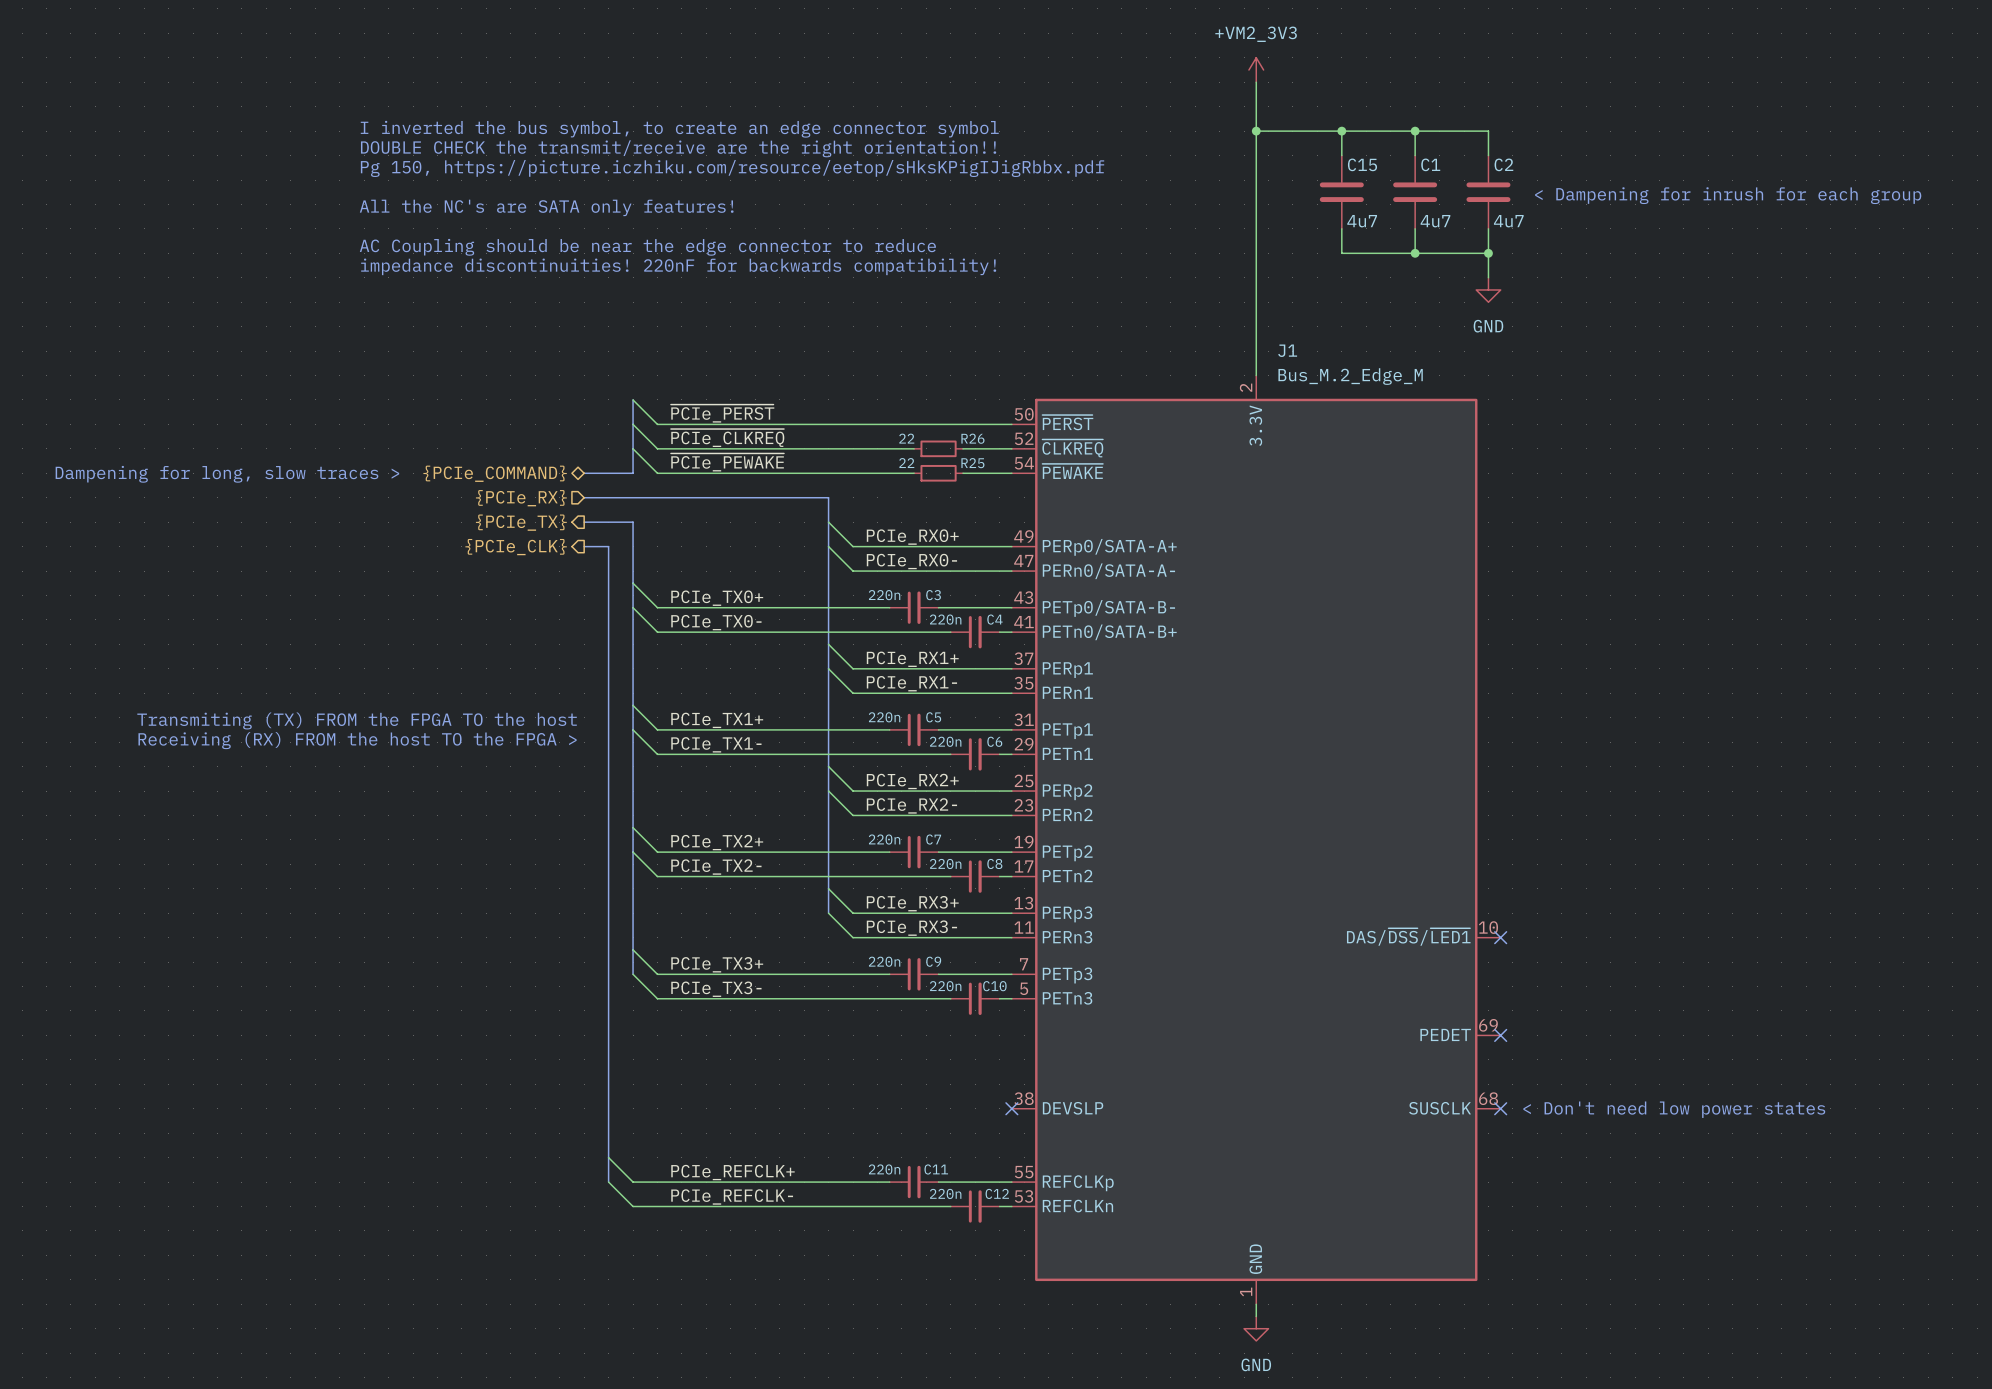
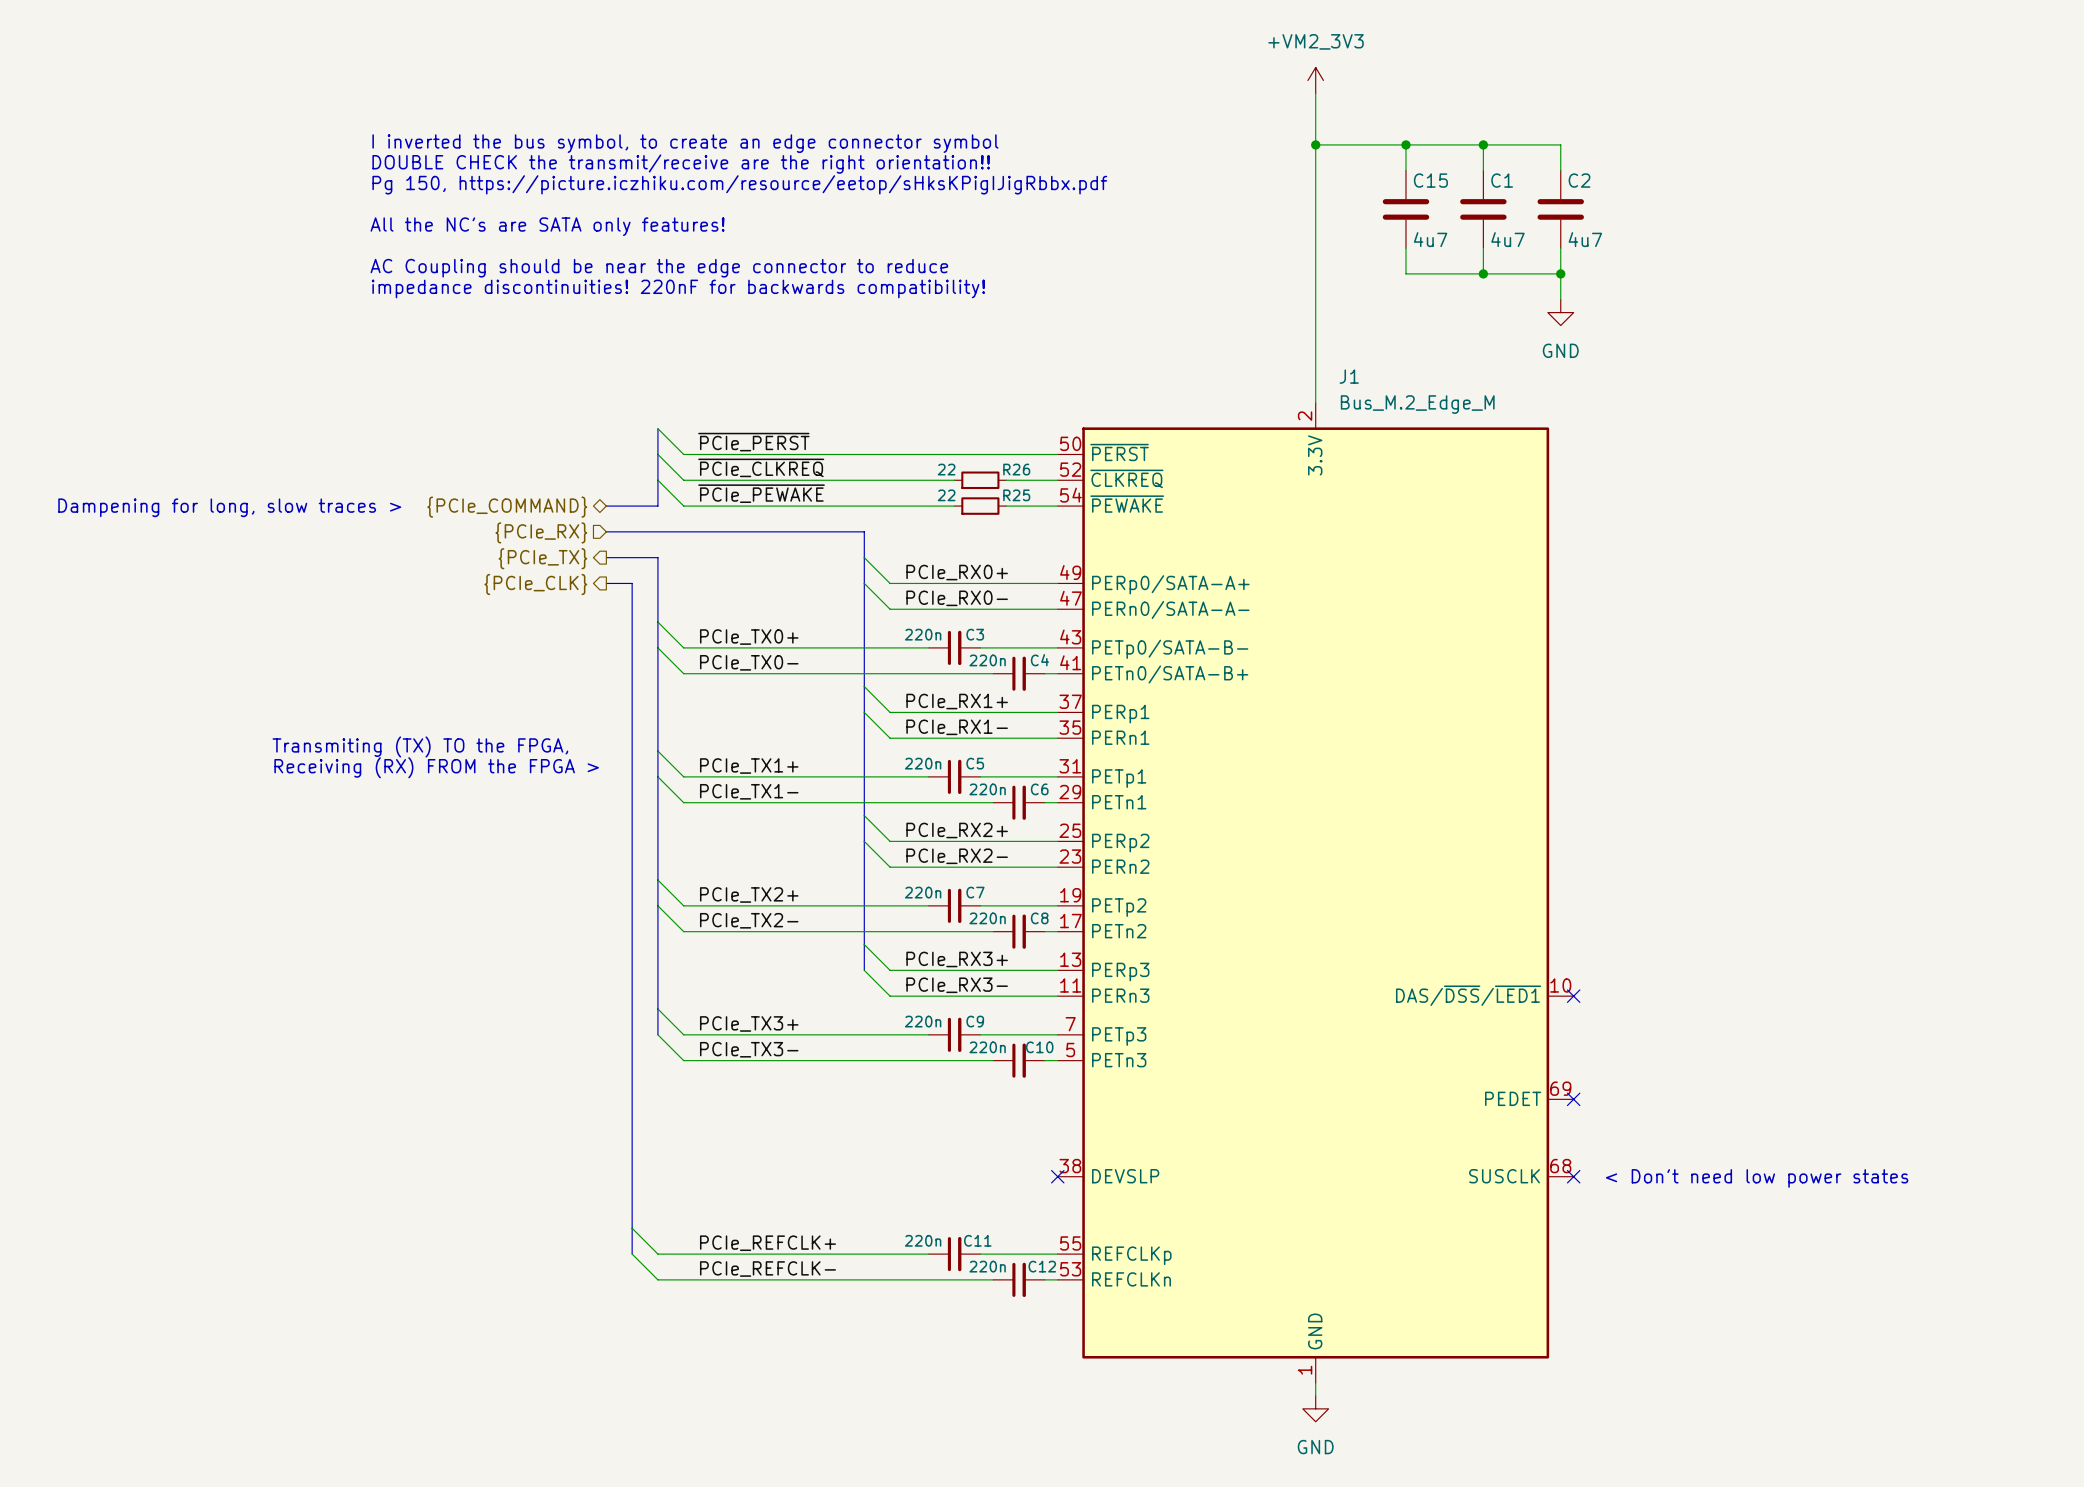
text: < Dampening for inrush for each group (1728, 195) -> none
text: none -> Transmiting (TX) TO the FPGA, (420, 746)
text: Transmiting (TX) FROM the FPGA TO the host (357, 720) -> none
text: none -> Receiving (RX) FROM the FPGA > (436, 767)
text: Receiving (RX) FROM the host TO the FPGA > (357, 740) -> none

